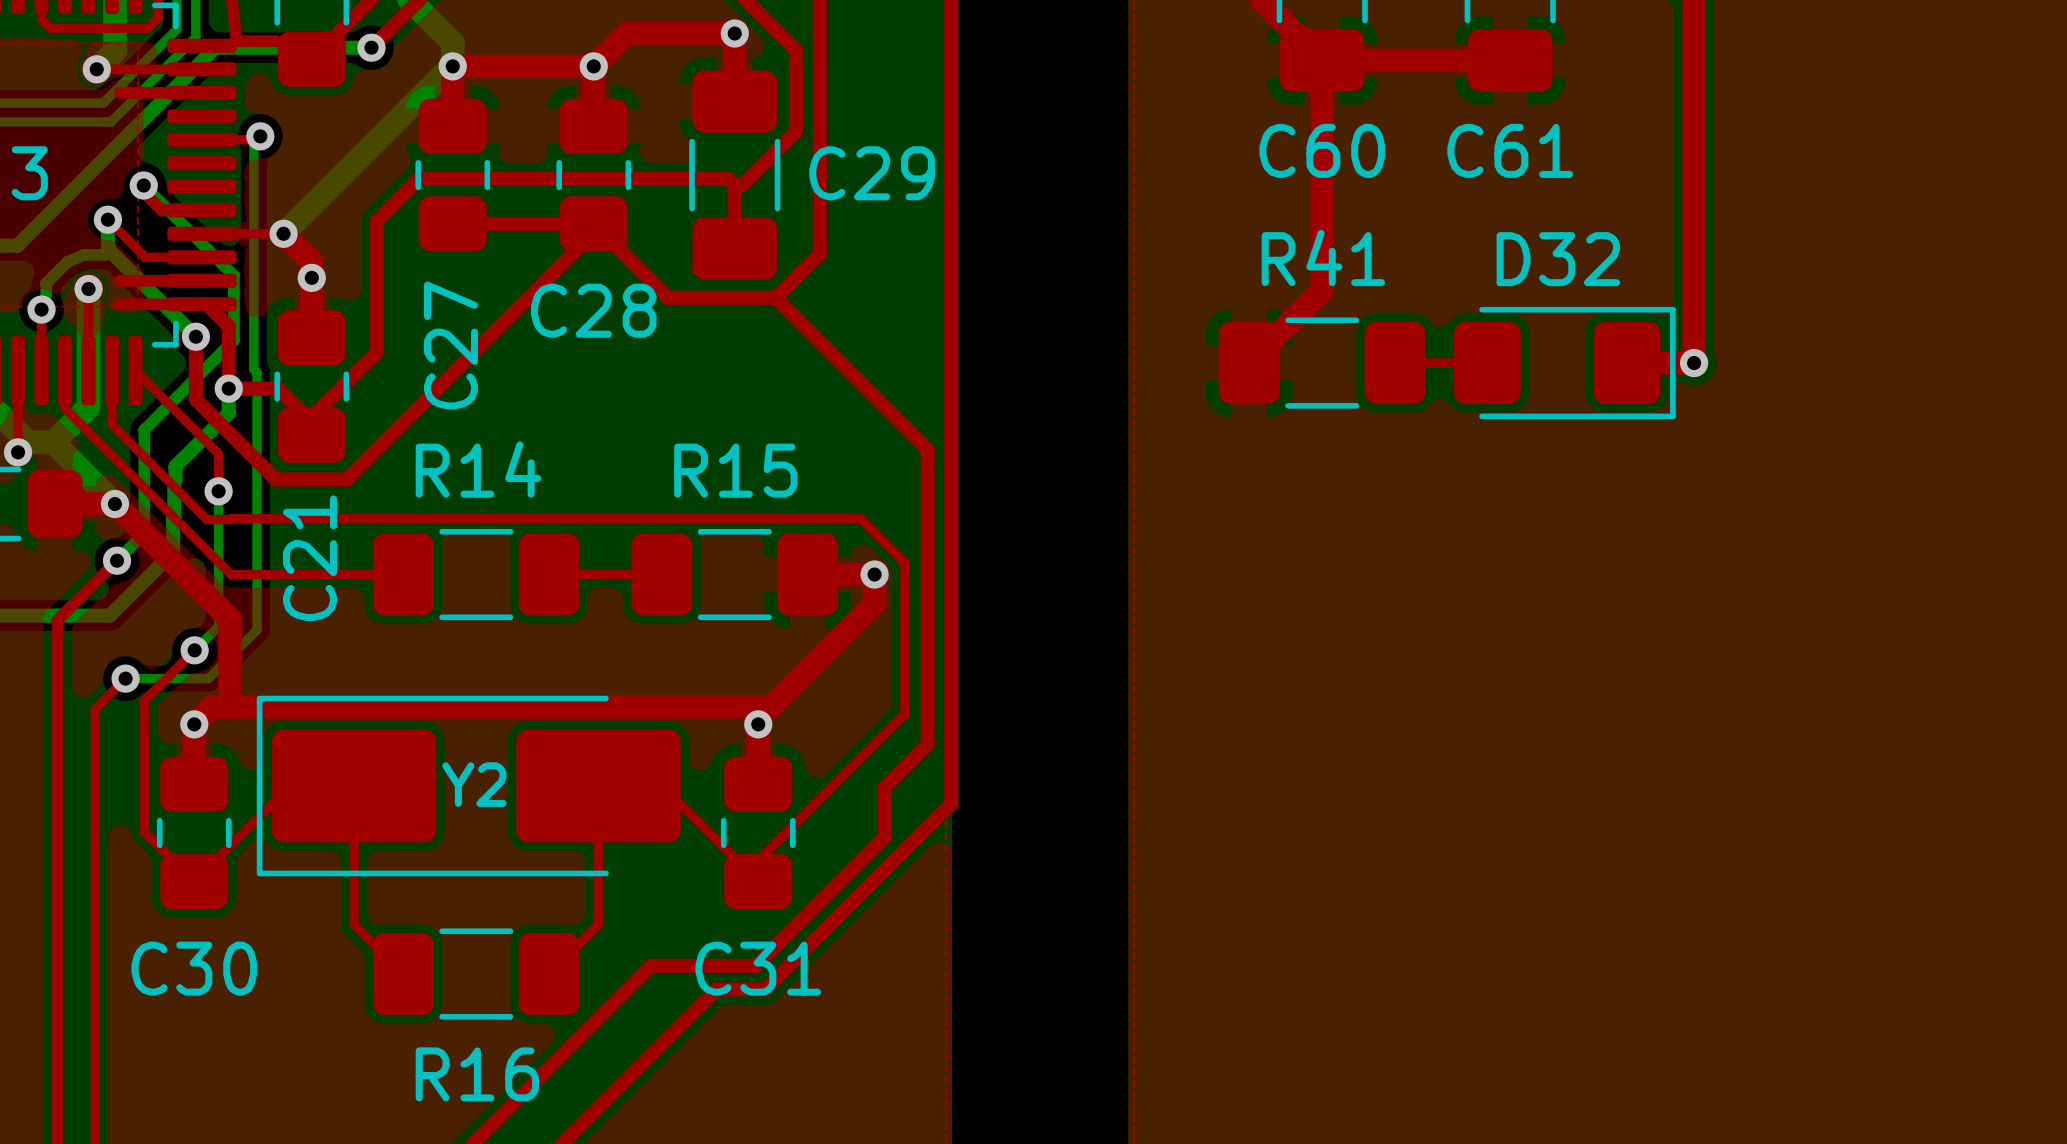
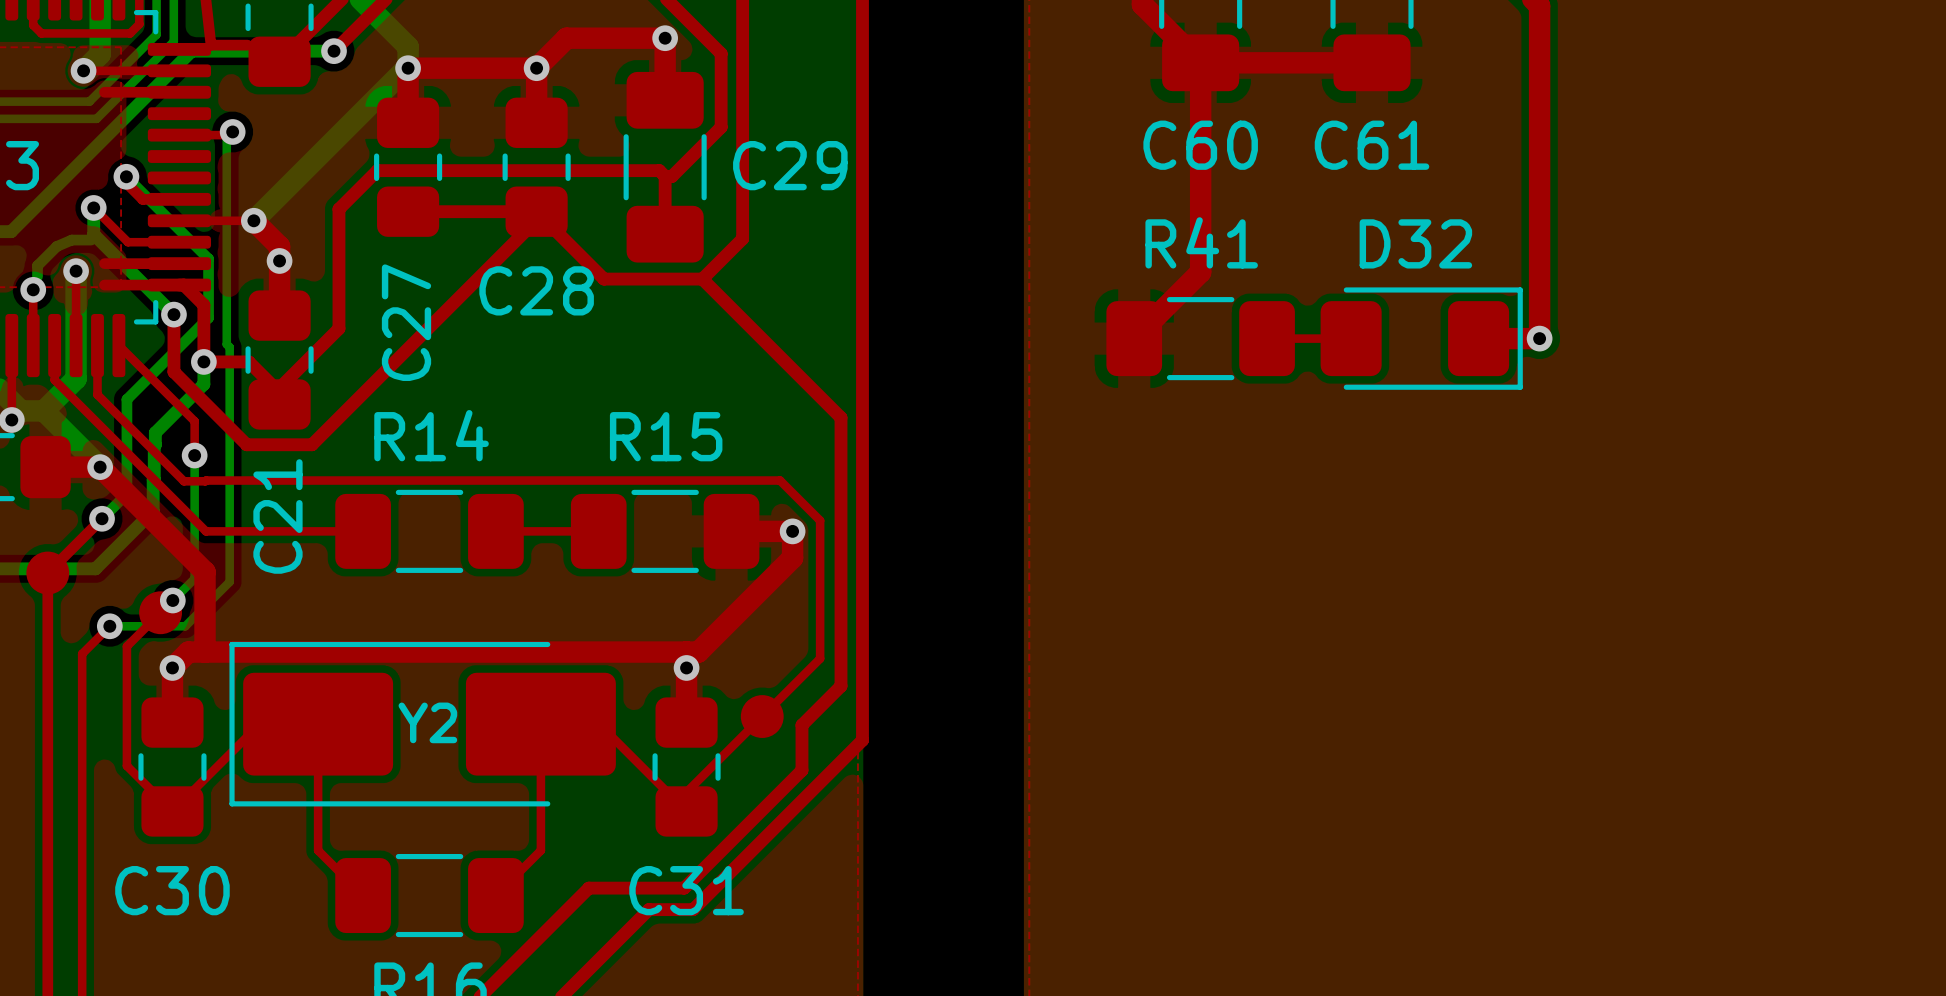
part: none -> (47, 573)
part: none -> (160, 612)
part: none -> (762, 716)

